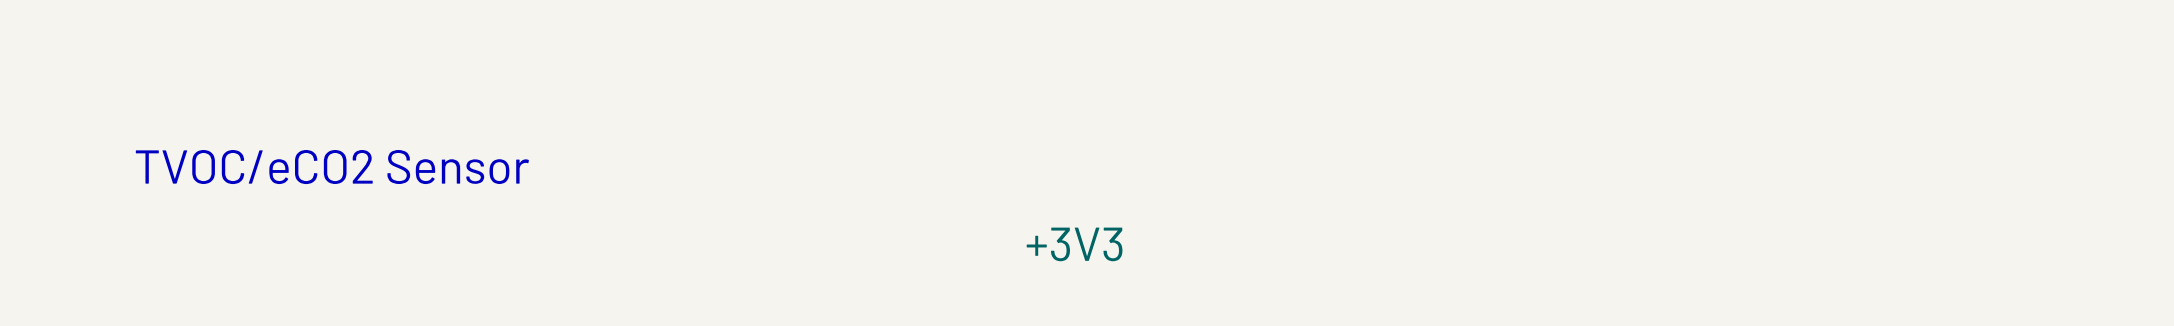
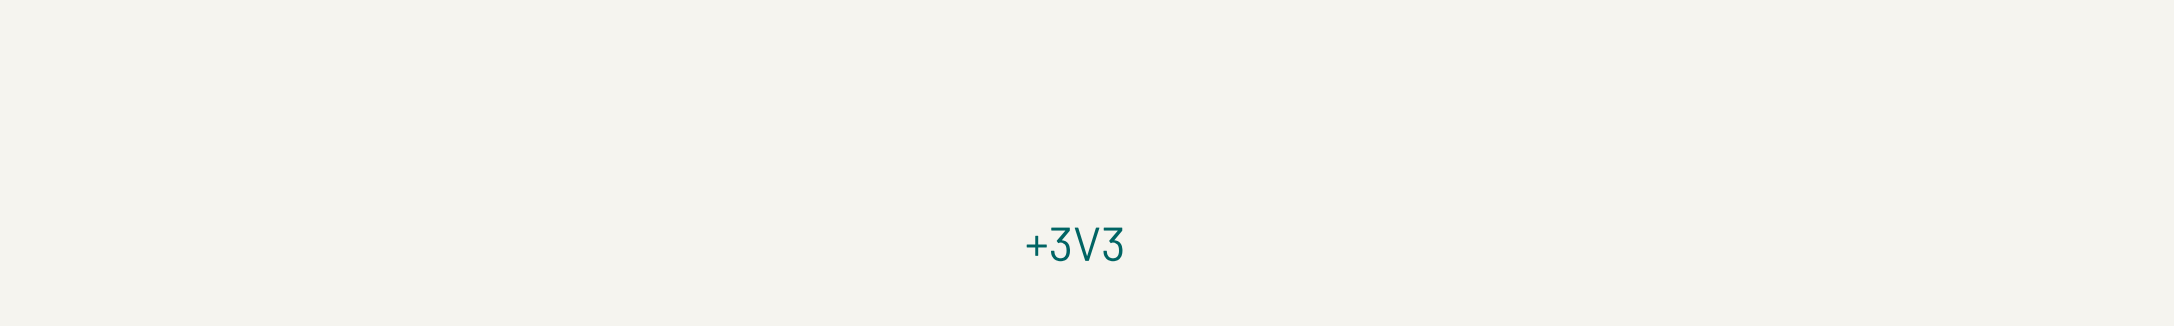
text: TVOC/eCO2 Sensor (332, 167) -> none

